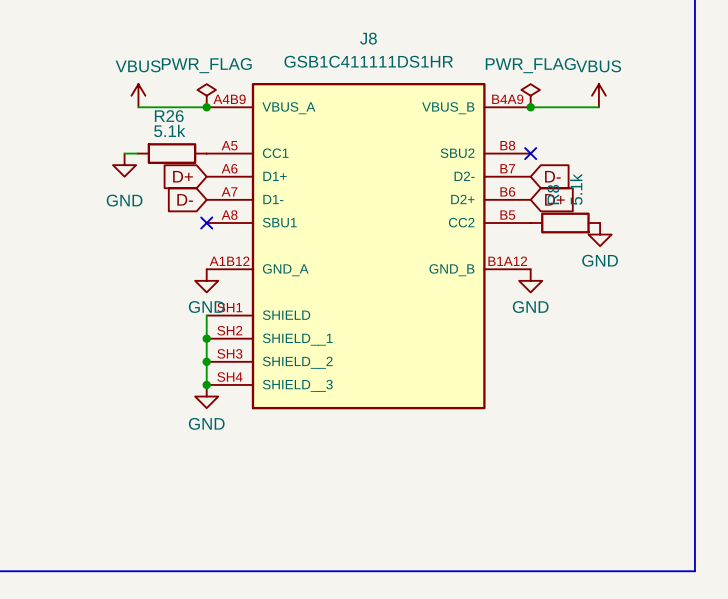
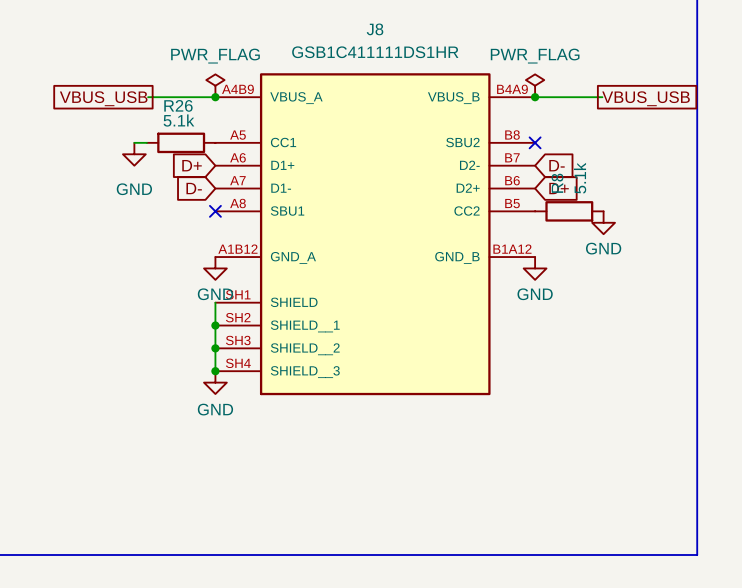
power symbol: VBUS (138, 95) -> none
power symbol: VBUS (598, 95) -> none
global label: none -> VBUS_USB (103, 98)
global label: none -> VBUS_USB (646, 98)

